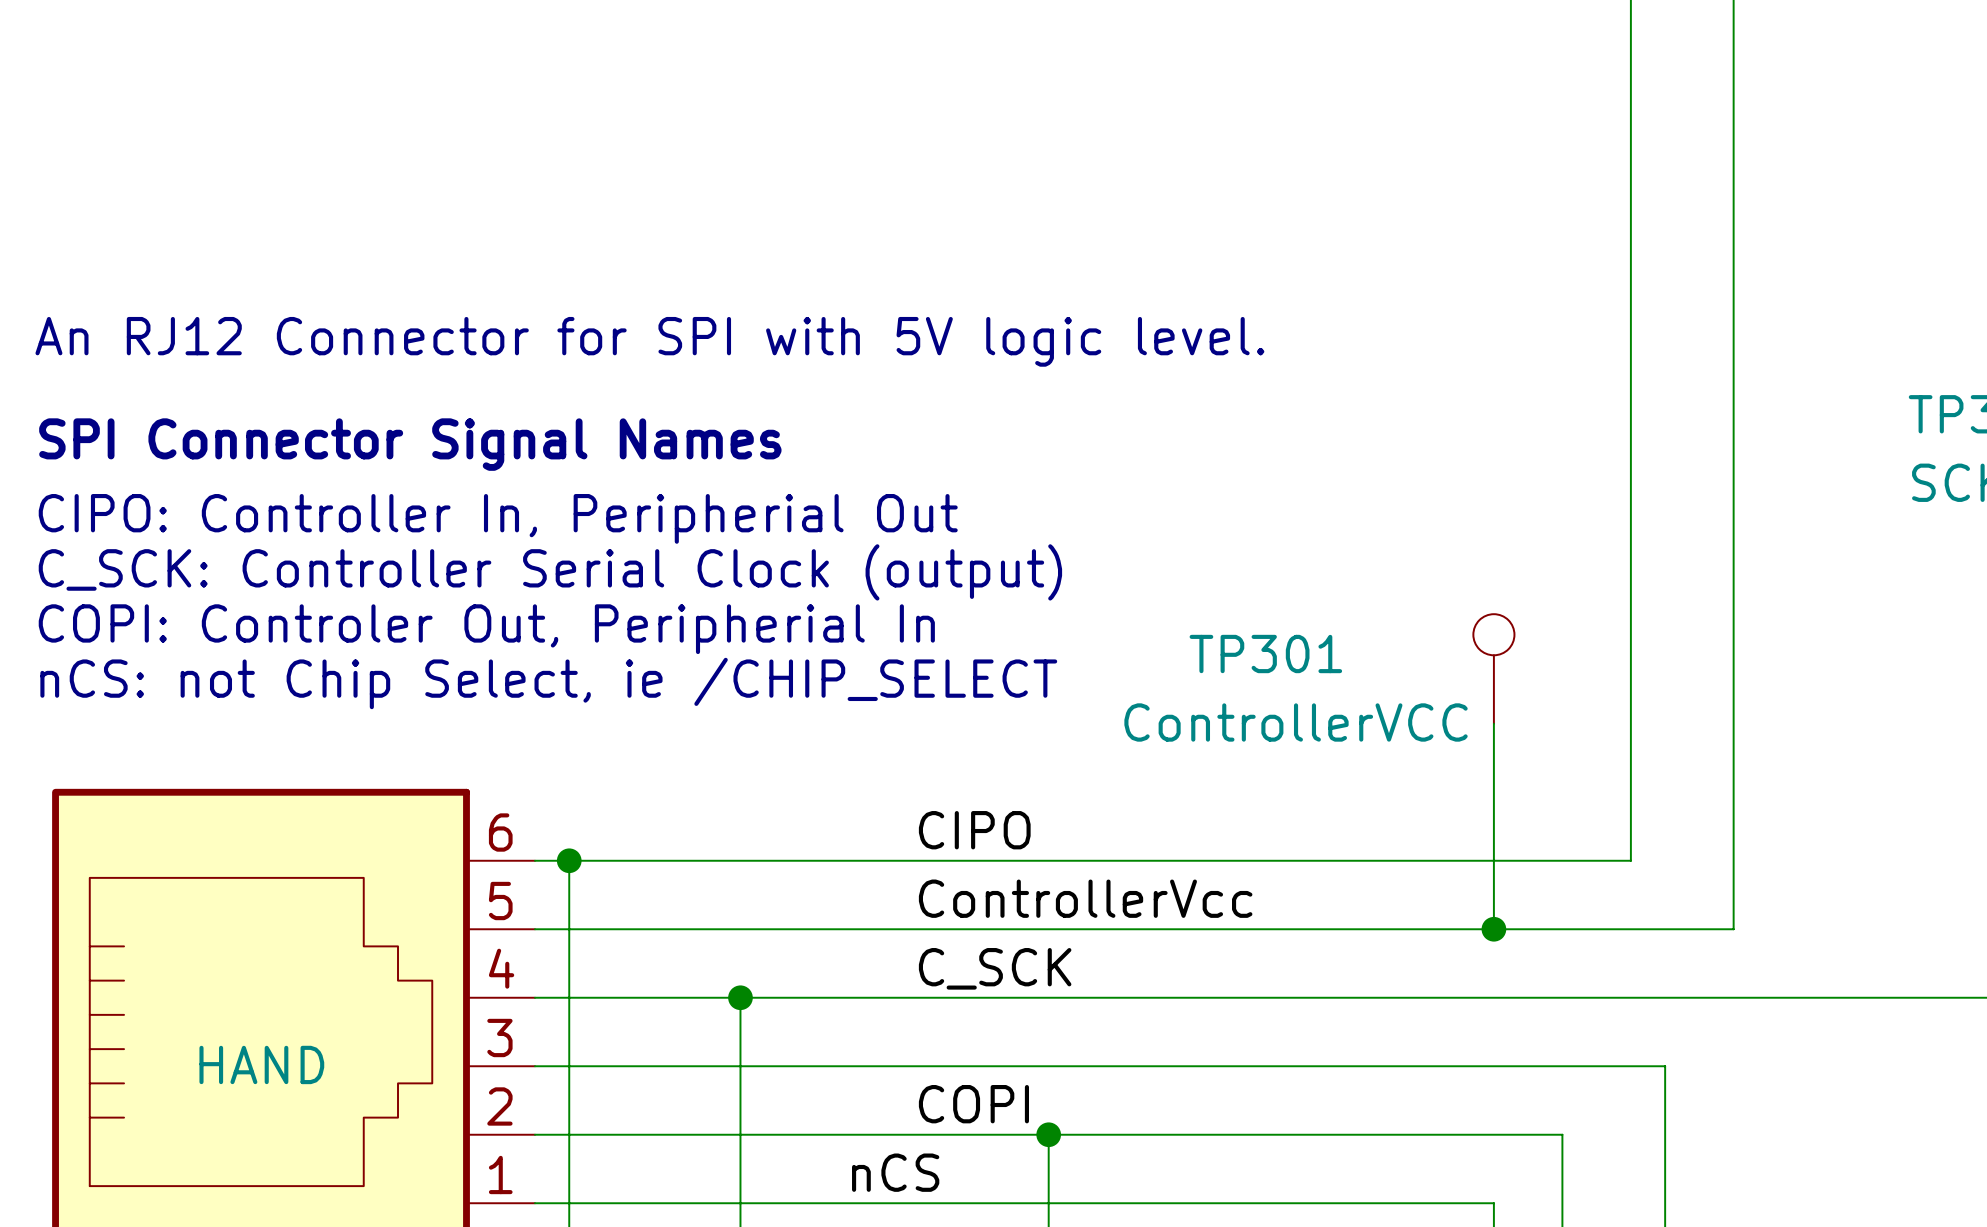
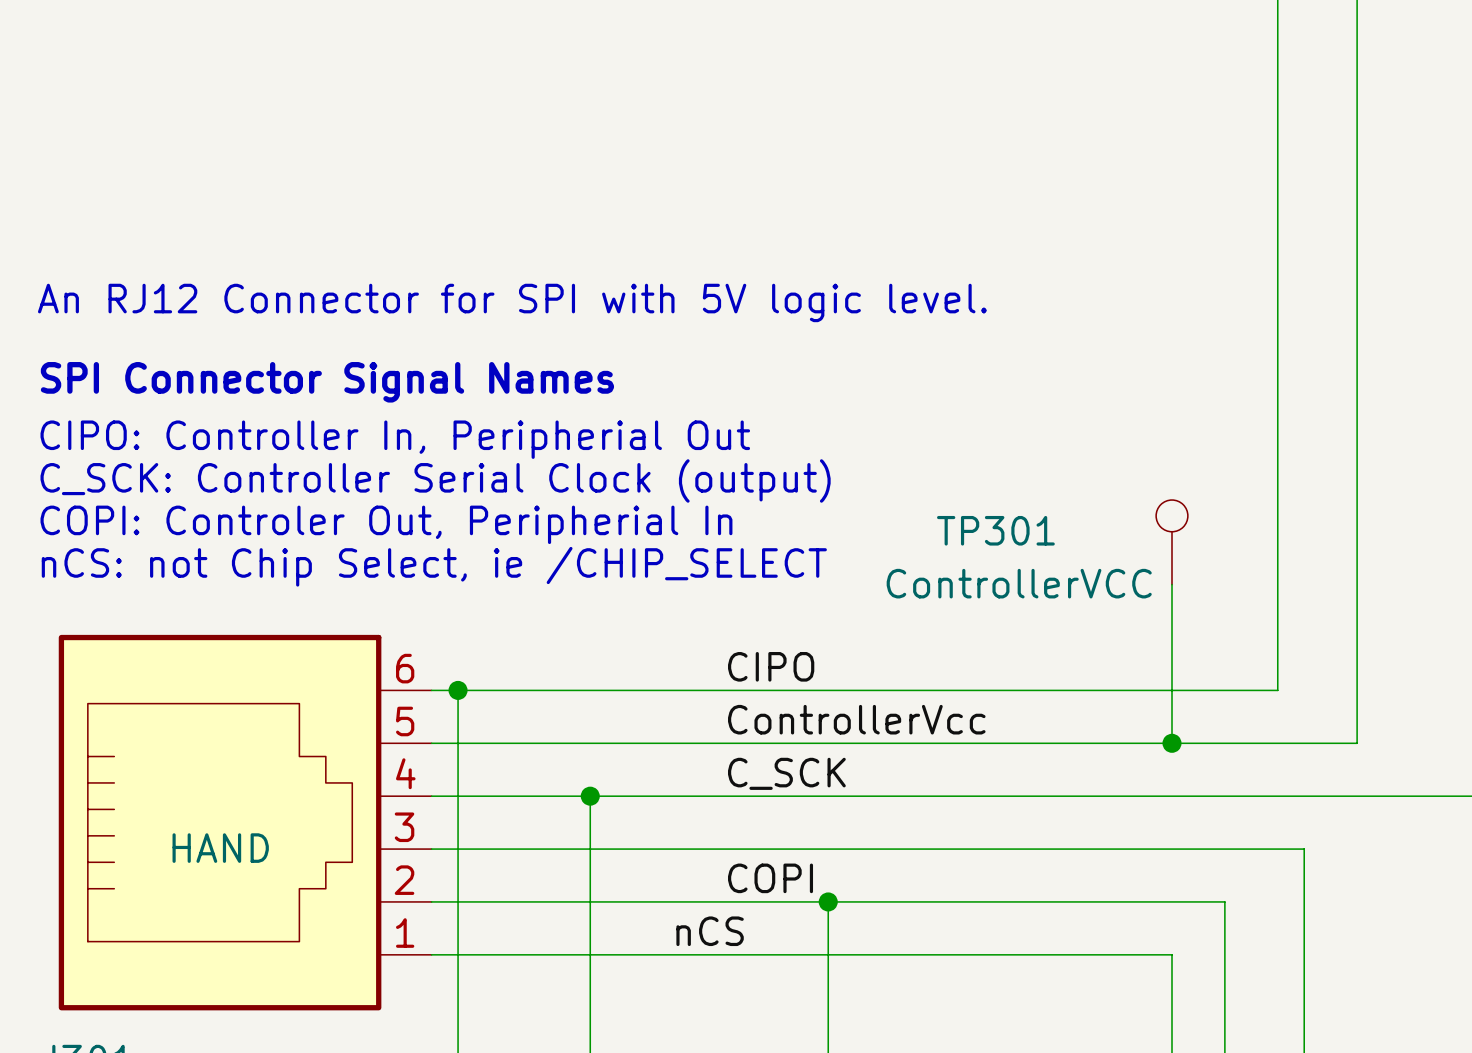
text position: An RJ12 Connector for SPI with 5V logic level. (649, 341) -> An RJ12 Connector for SPI with 5V logic level. (512, 302)
text position: SPI Connector Signal Names (410, 444) -> SPI Connector Signal Names (327, 382)
text position: CIPO: Controller In, Peripherial Out (498, 518) -> CIPO: Controller In, Peripherial Out (395, 439)
text position: C_SCK: Controller Serial Clock (output) (550, 572) -> C_SCK: Controller Serial Clock (output) (435, 480)
text position: COPI: Controler Out, Peripherial In (486, 629) -> COPI: Controler Out, Peripherial In (386, 524)
text position: nCS: not Chip Select, ie /CHIP_SELECT (548, 683) -> nCS: not Chip Select, ie /CHIP_SELECT (434, 566)

